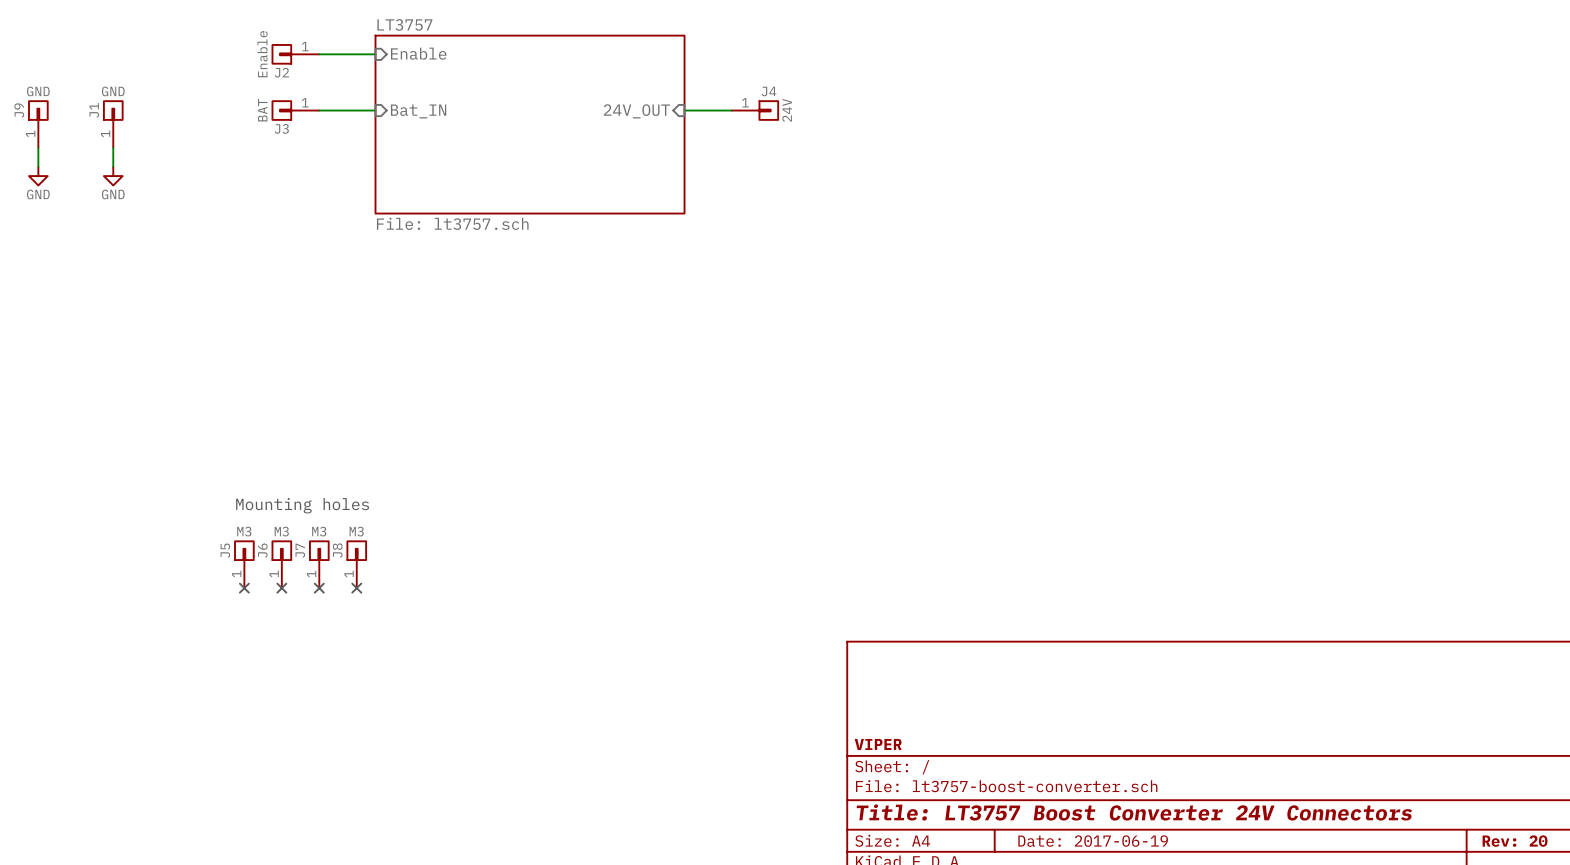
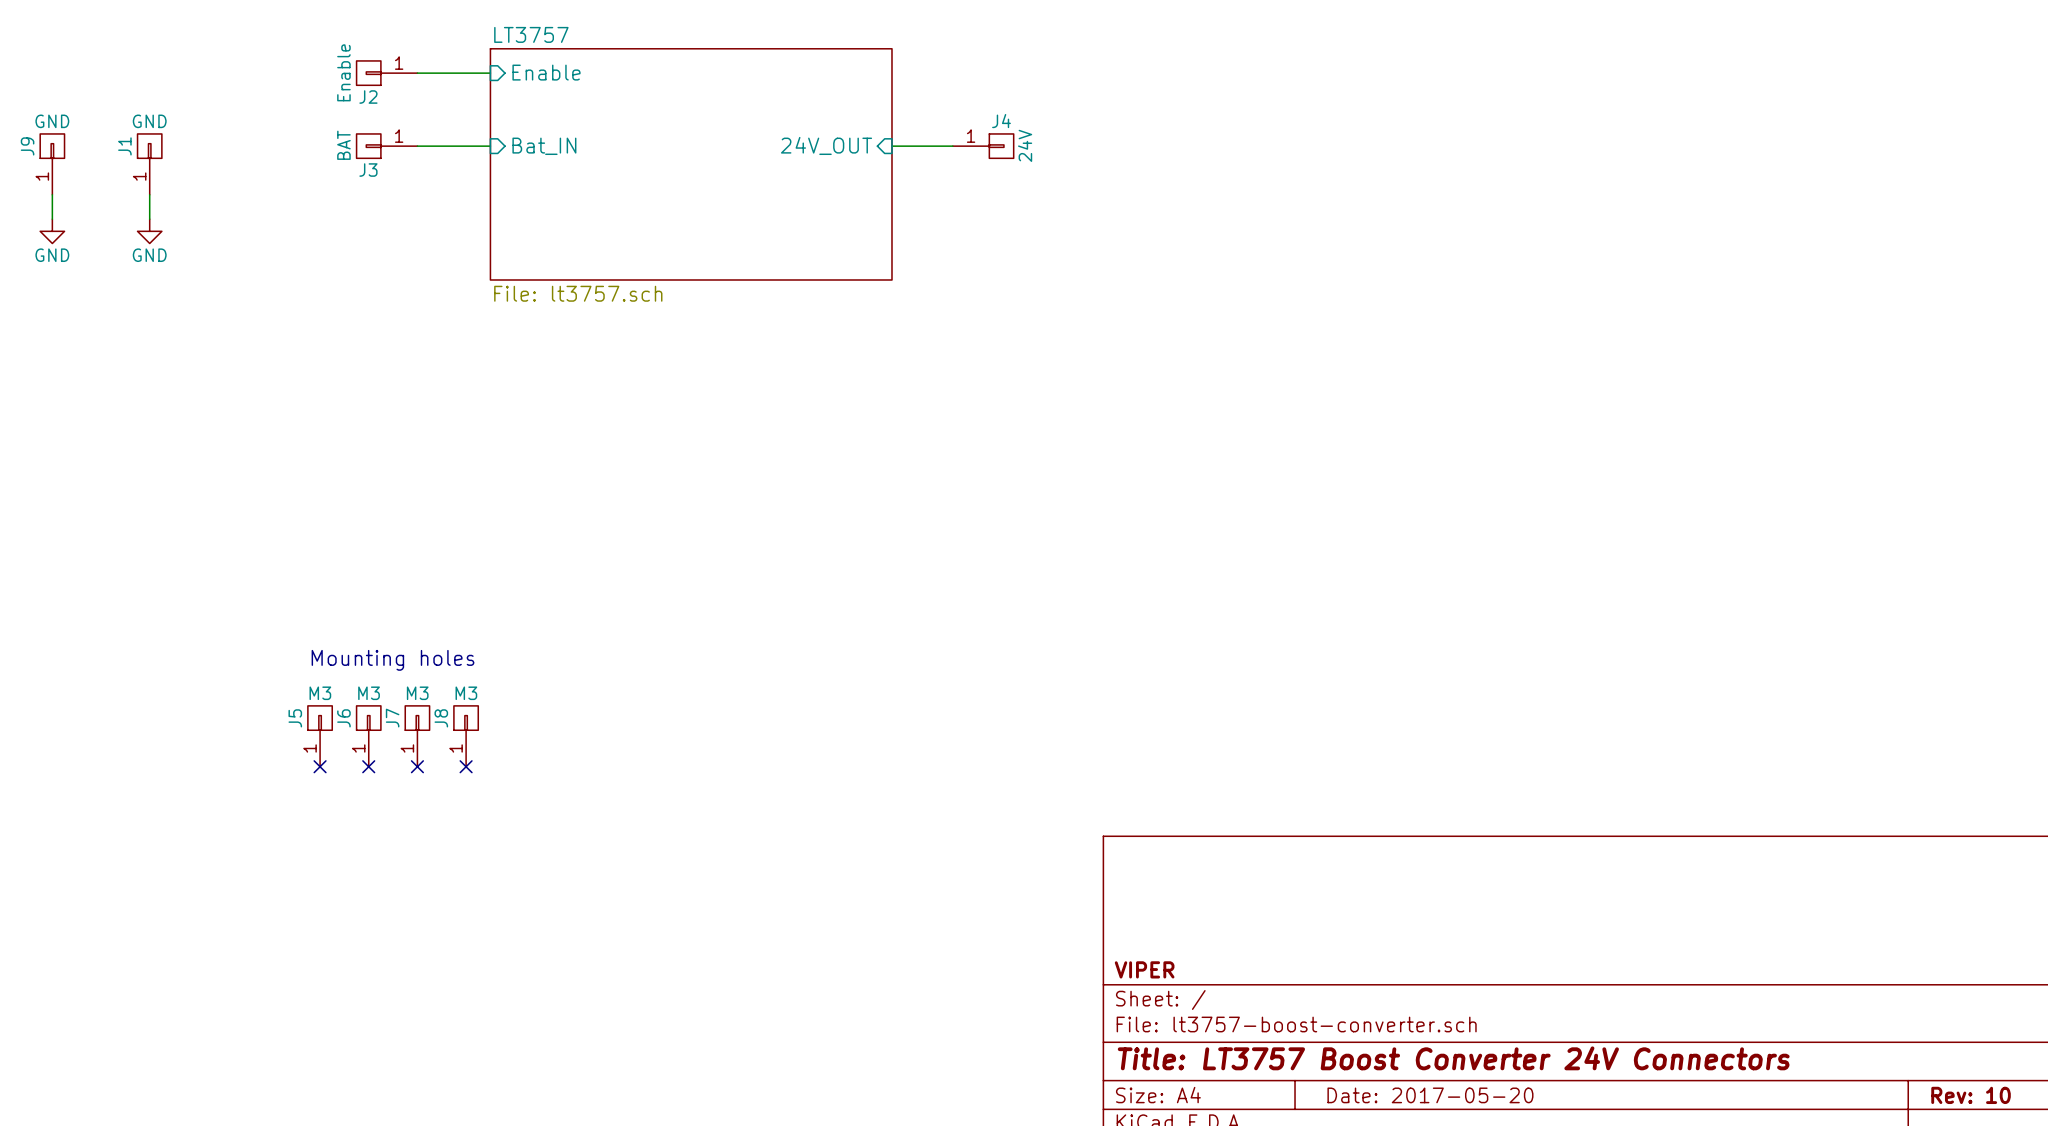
title block: Date: 2017-06-19 (1093, 841) -> Date: 2017-05-20 (1430, 1095)
title block: Rev: 20 (1515, 841) -> Rev: 10 (1971, 1095)

